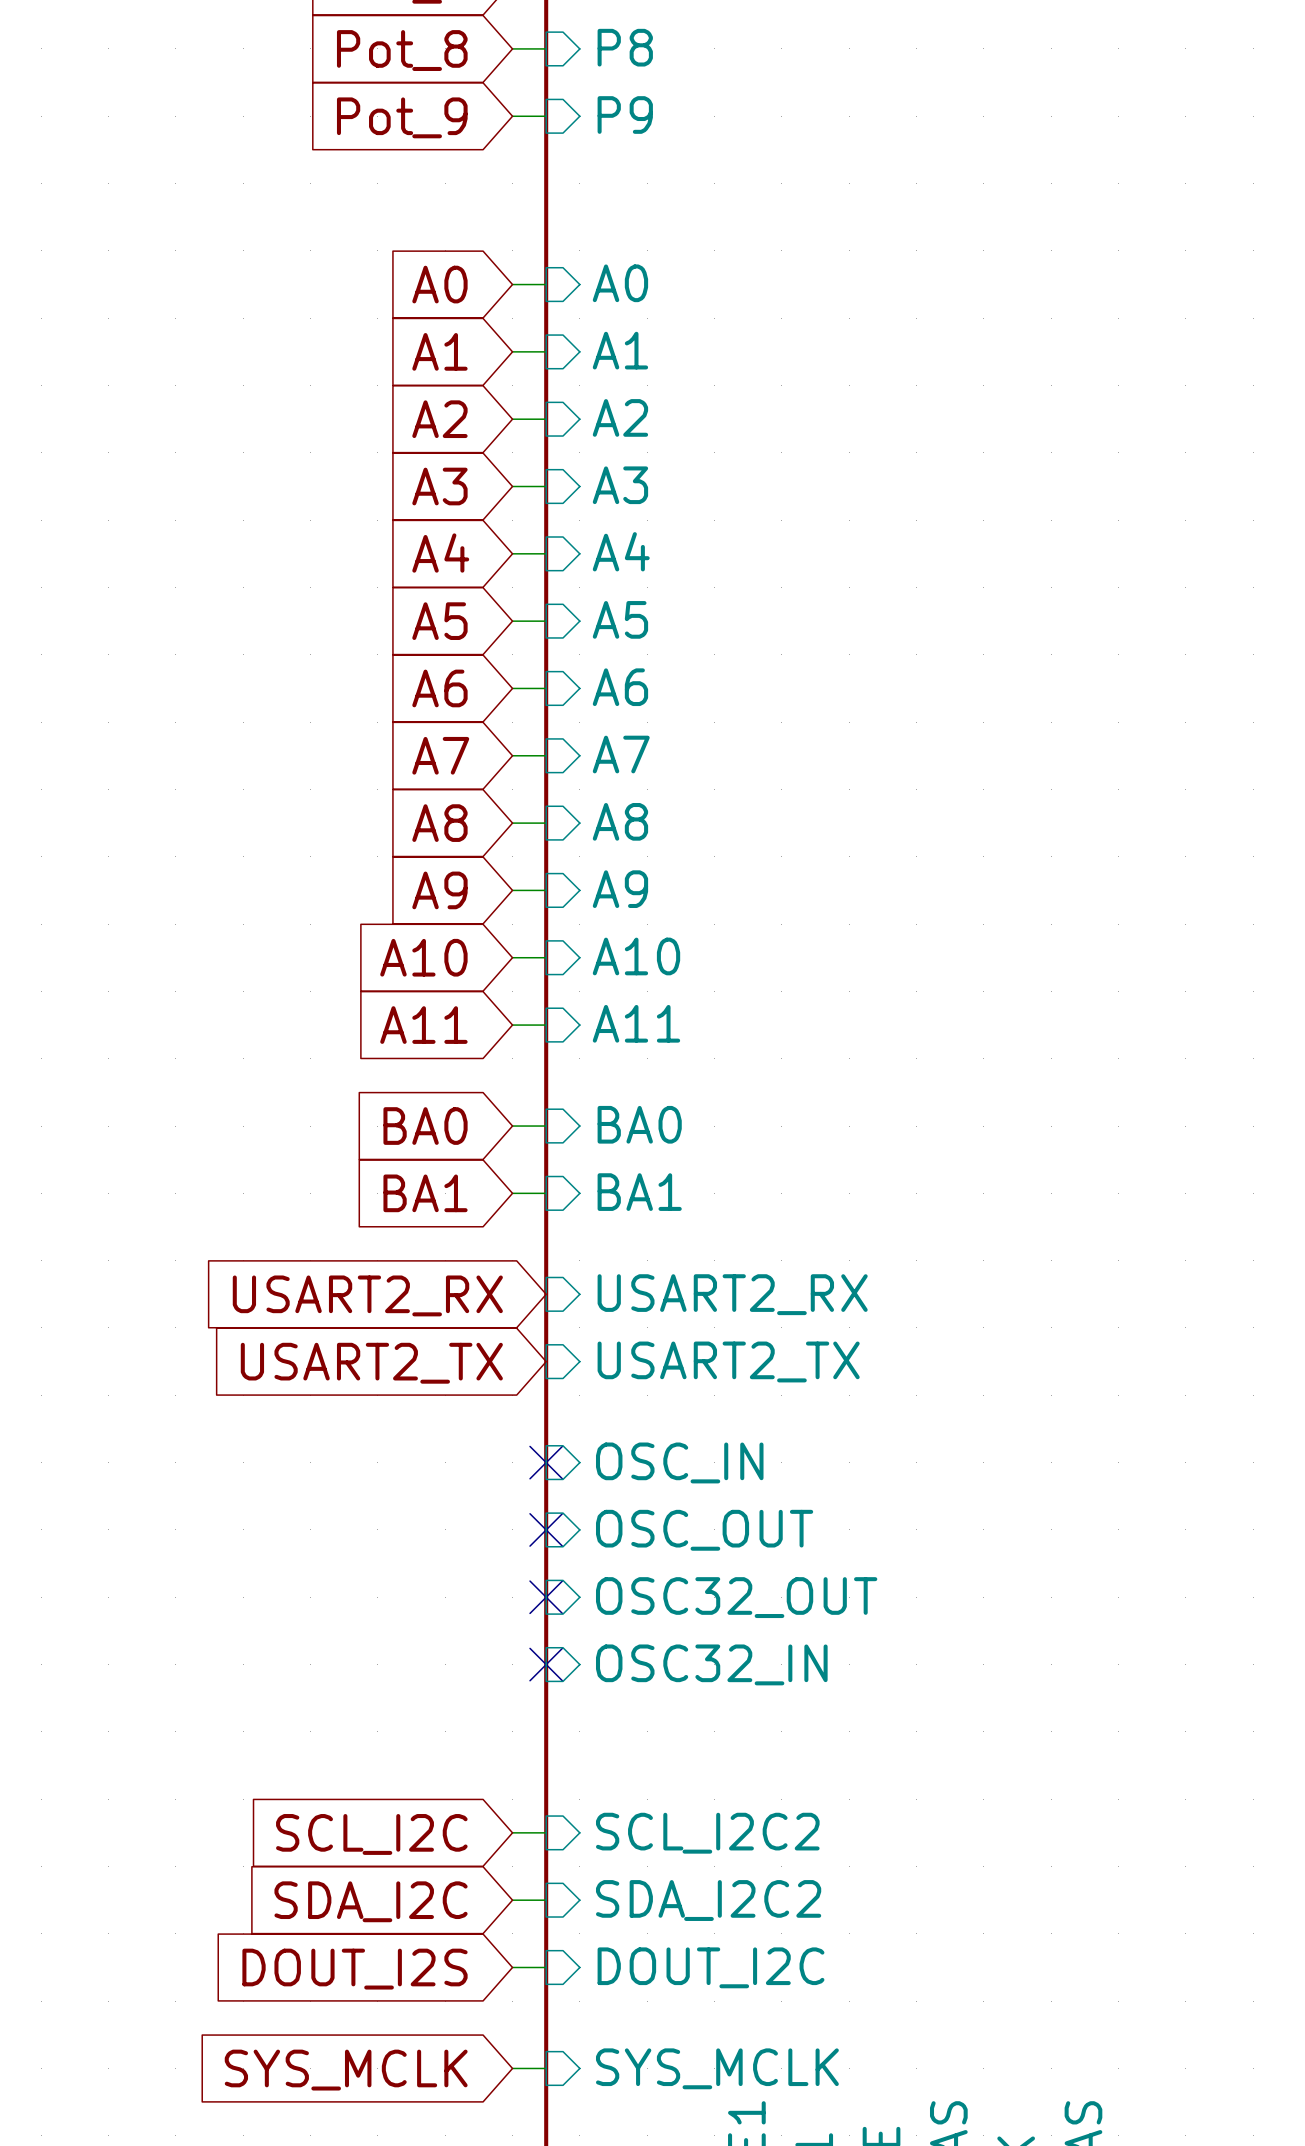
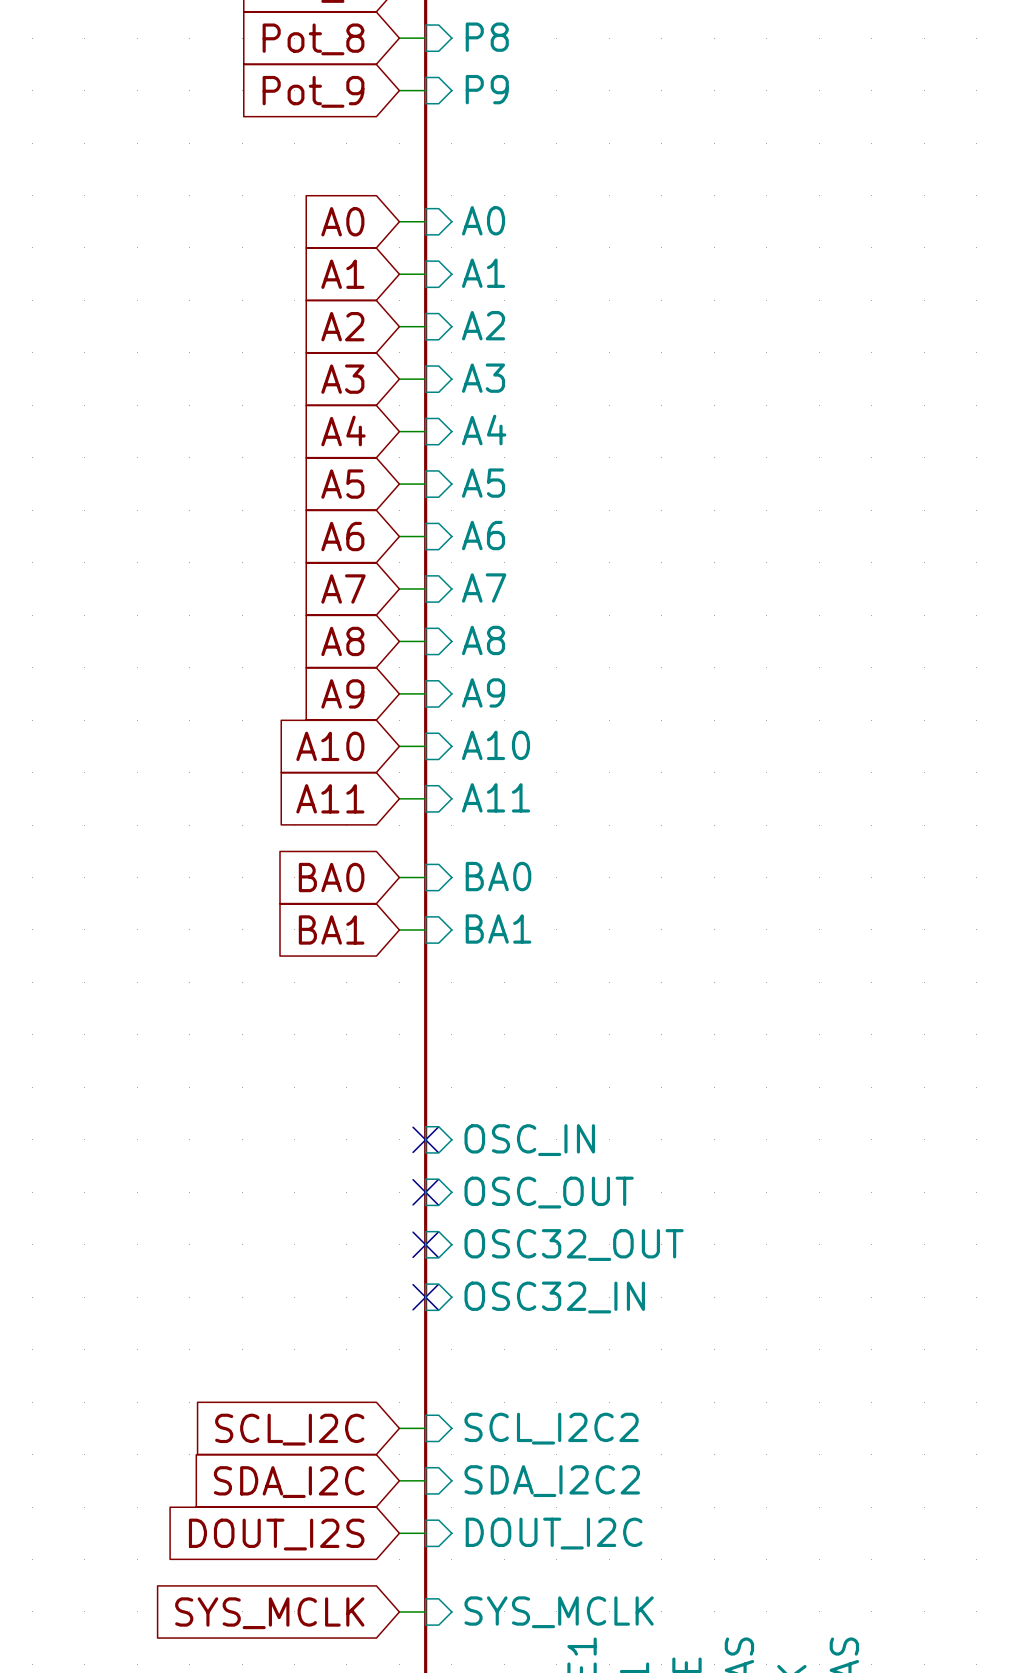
sheet pin: USART2_RX (732, 1294) -> none
global label: USART2_RX (367, 1295) -> none
sheet pin: USART2_TX (728, 1361) -> none
global label: USART2_TX (371, 1363) -> none

